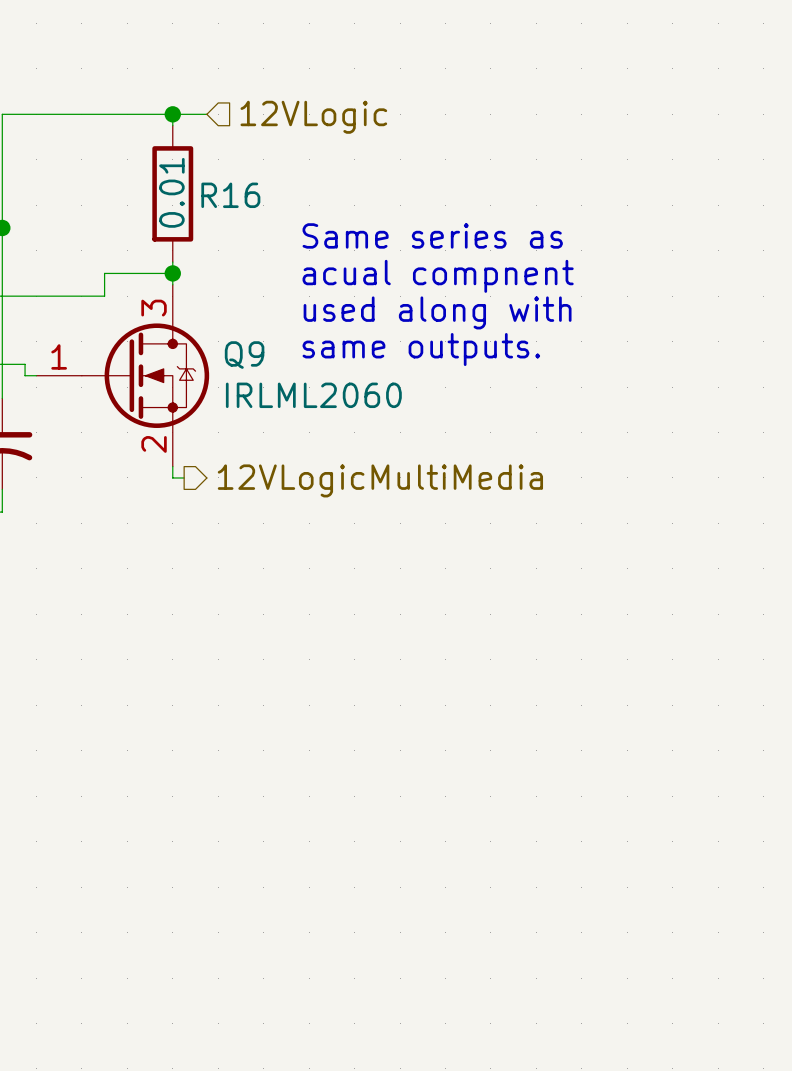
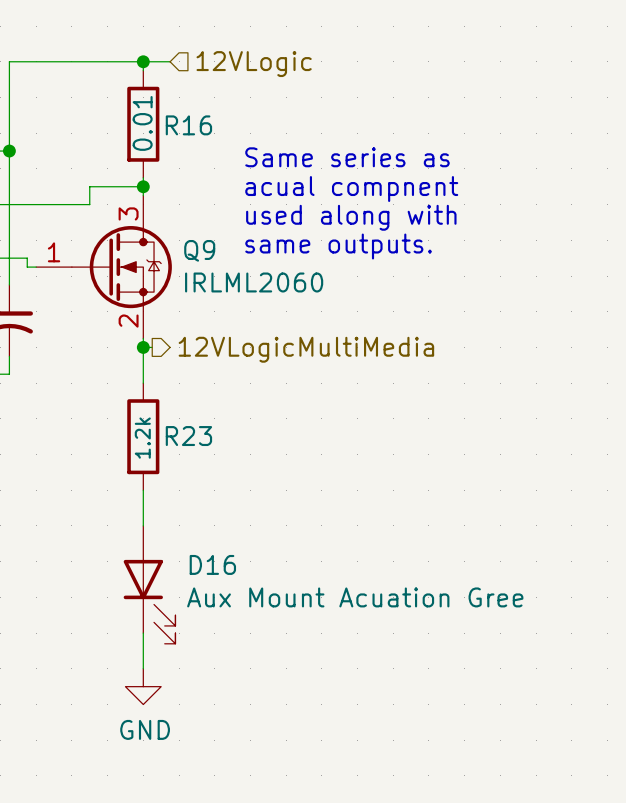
wire: none -> (143, 347) (143, 383)
junction: none -> (143, 347)
R23: none -> 1.2k (143, 436)
wire: none -> (143, 490) (143, 525)
D16: none -> Aux Mount Acuation Gree (149, 584)
wire: none -> (143, 633) (143, 668)
power symbol: none -> GND (143, 686)

